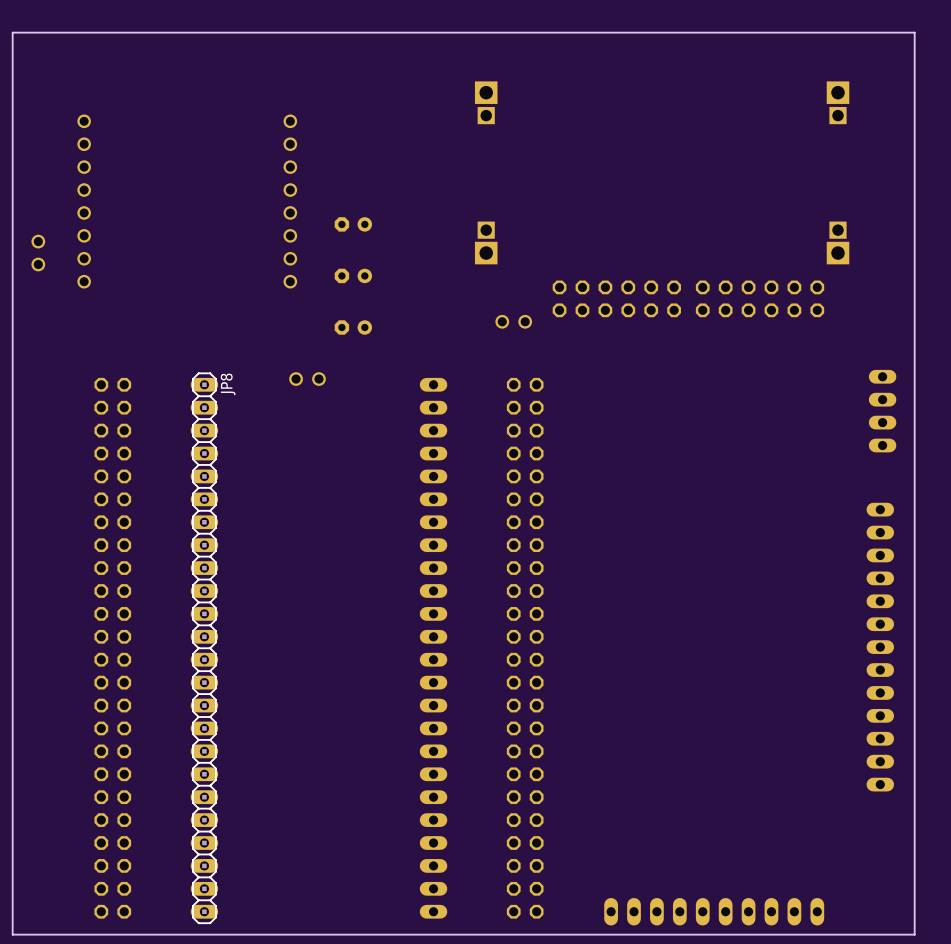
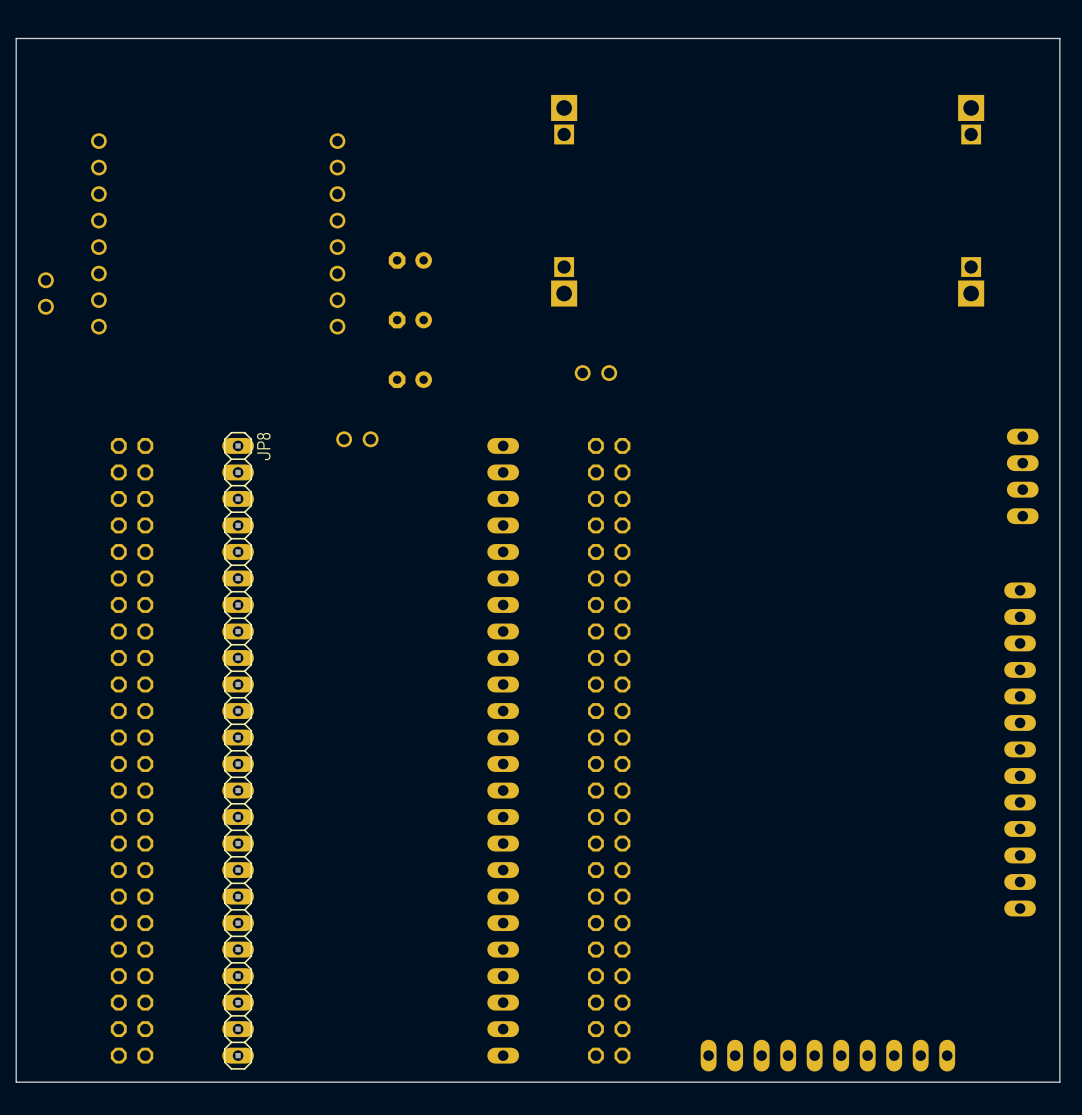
part: (616, 298) -> none
part: (760, 298) -> none

